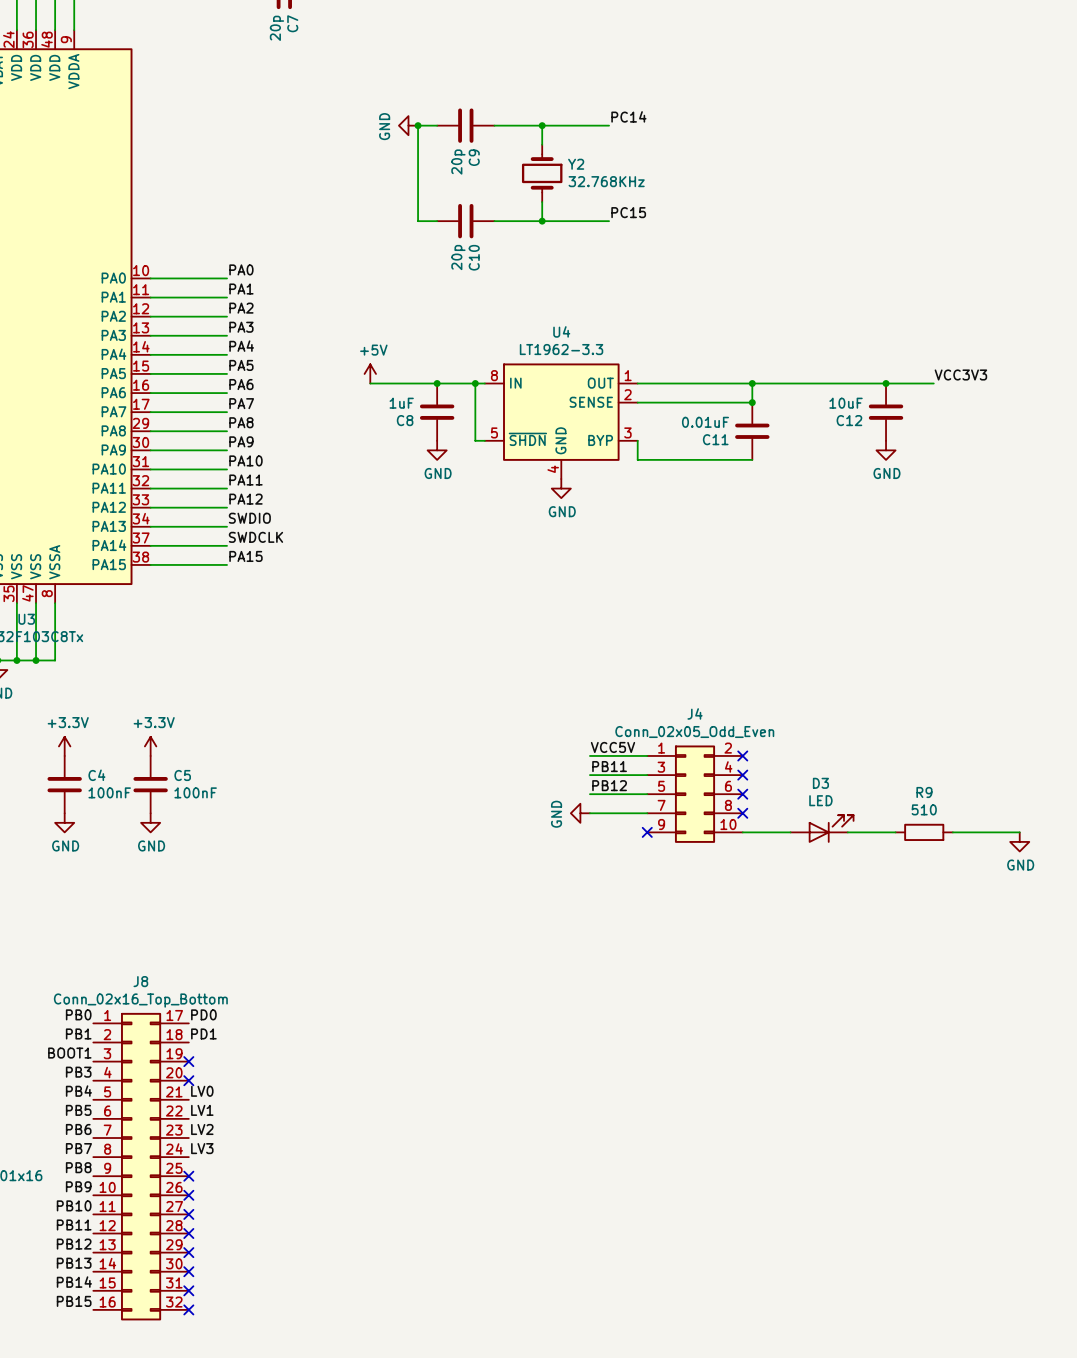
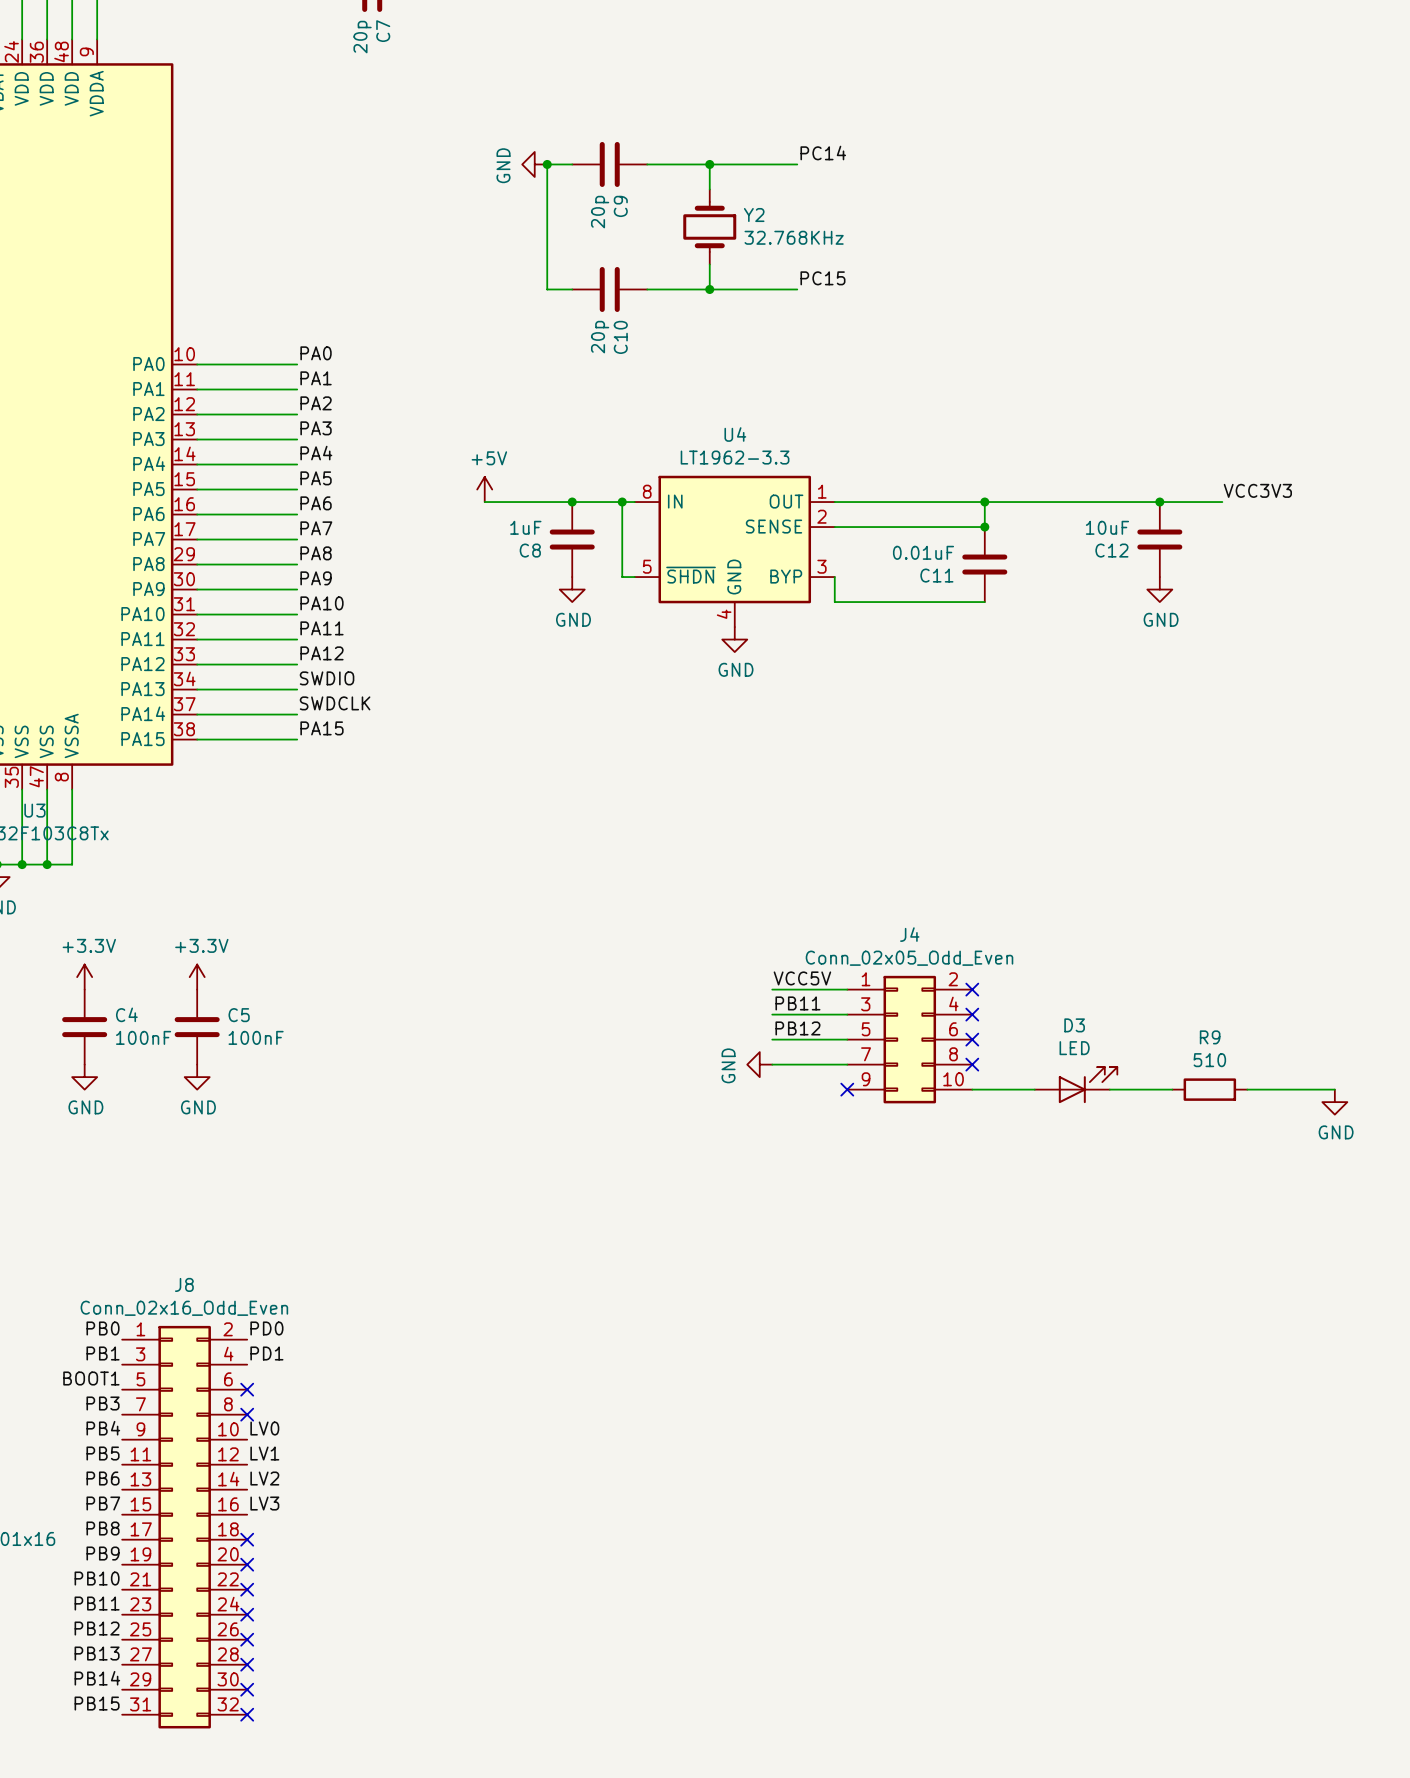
J8 value: Conn_02x16_Top_Bottom (140, 1000) -> Conn_02x16_Odd_Even (184, 1308)
J8 symbol: [93, 1012, 189, 1321] -> [122, 1325, 248, 1729]

